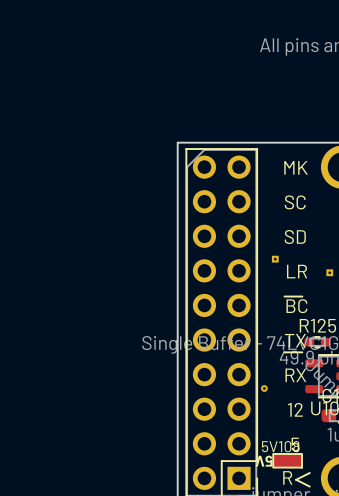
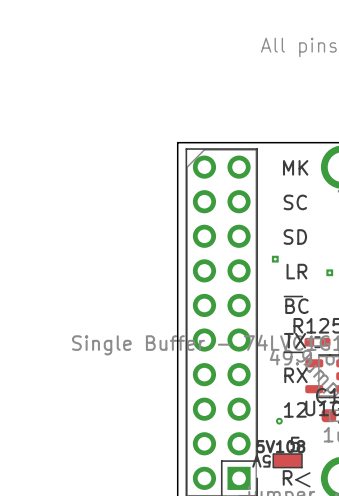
part position: (264, 388) -> (279, 421)

